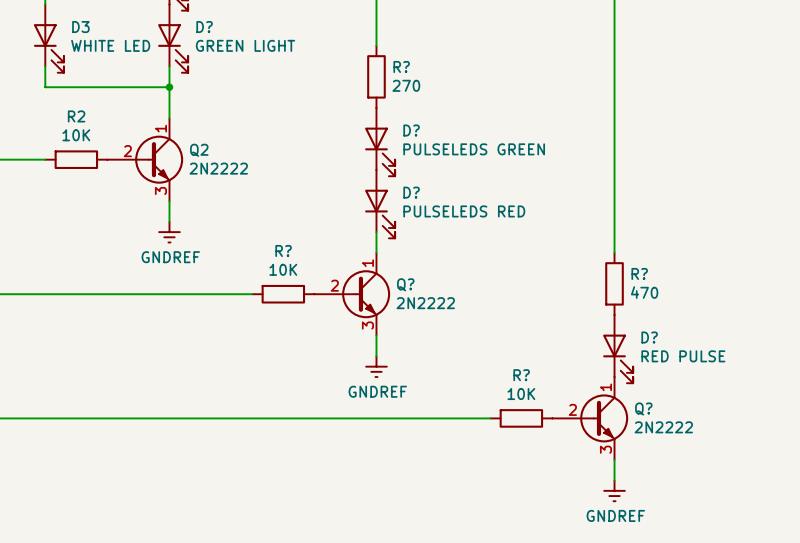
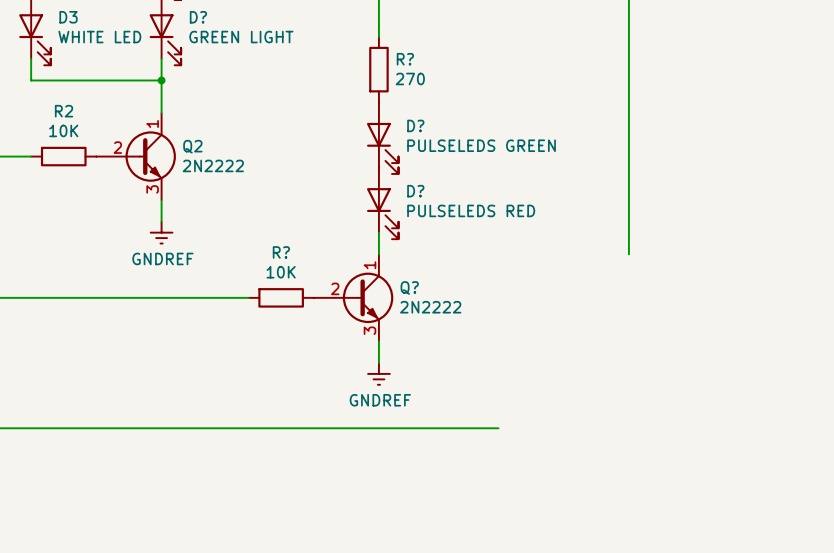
R?: 470 (614, 283) -> none
D?: RED PULSE (618, 349) -> none
R?: 10K (521, 418) -> none
Q?: 2N2222 (590, 418) -> none
wire: (614, 459) (614, 480) -> none
power symbol: GNDREF (614, 490) -> none

